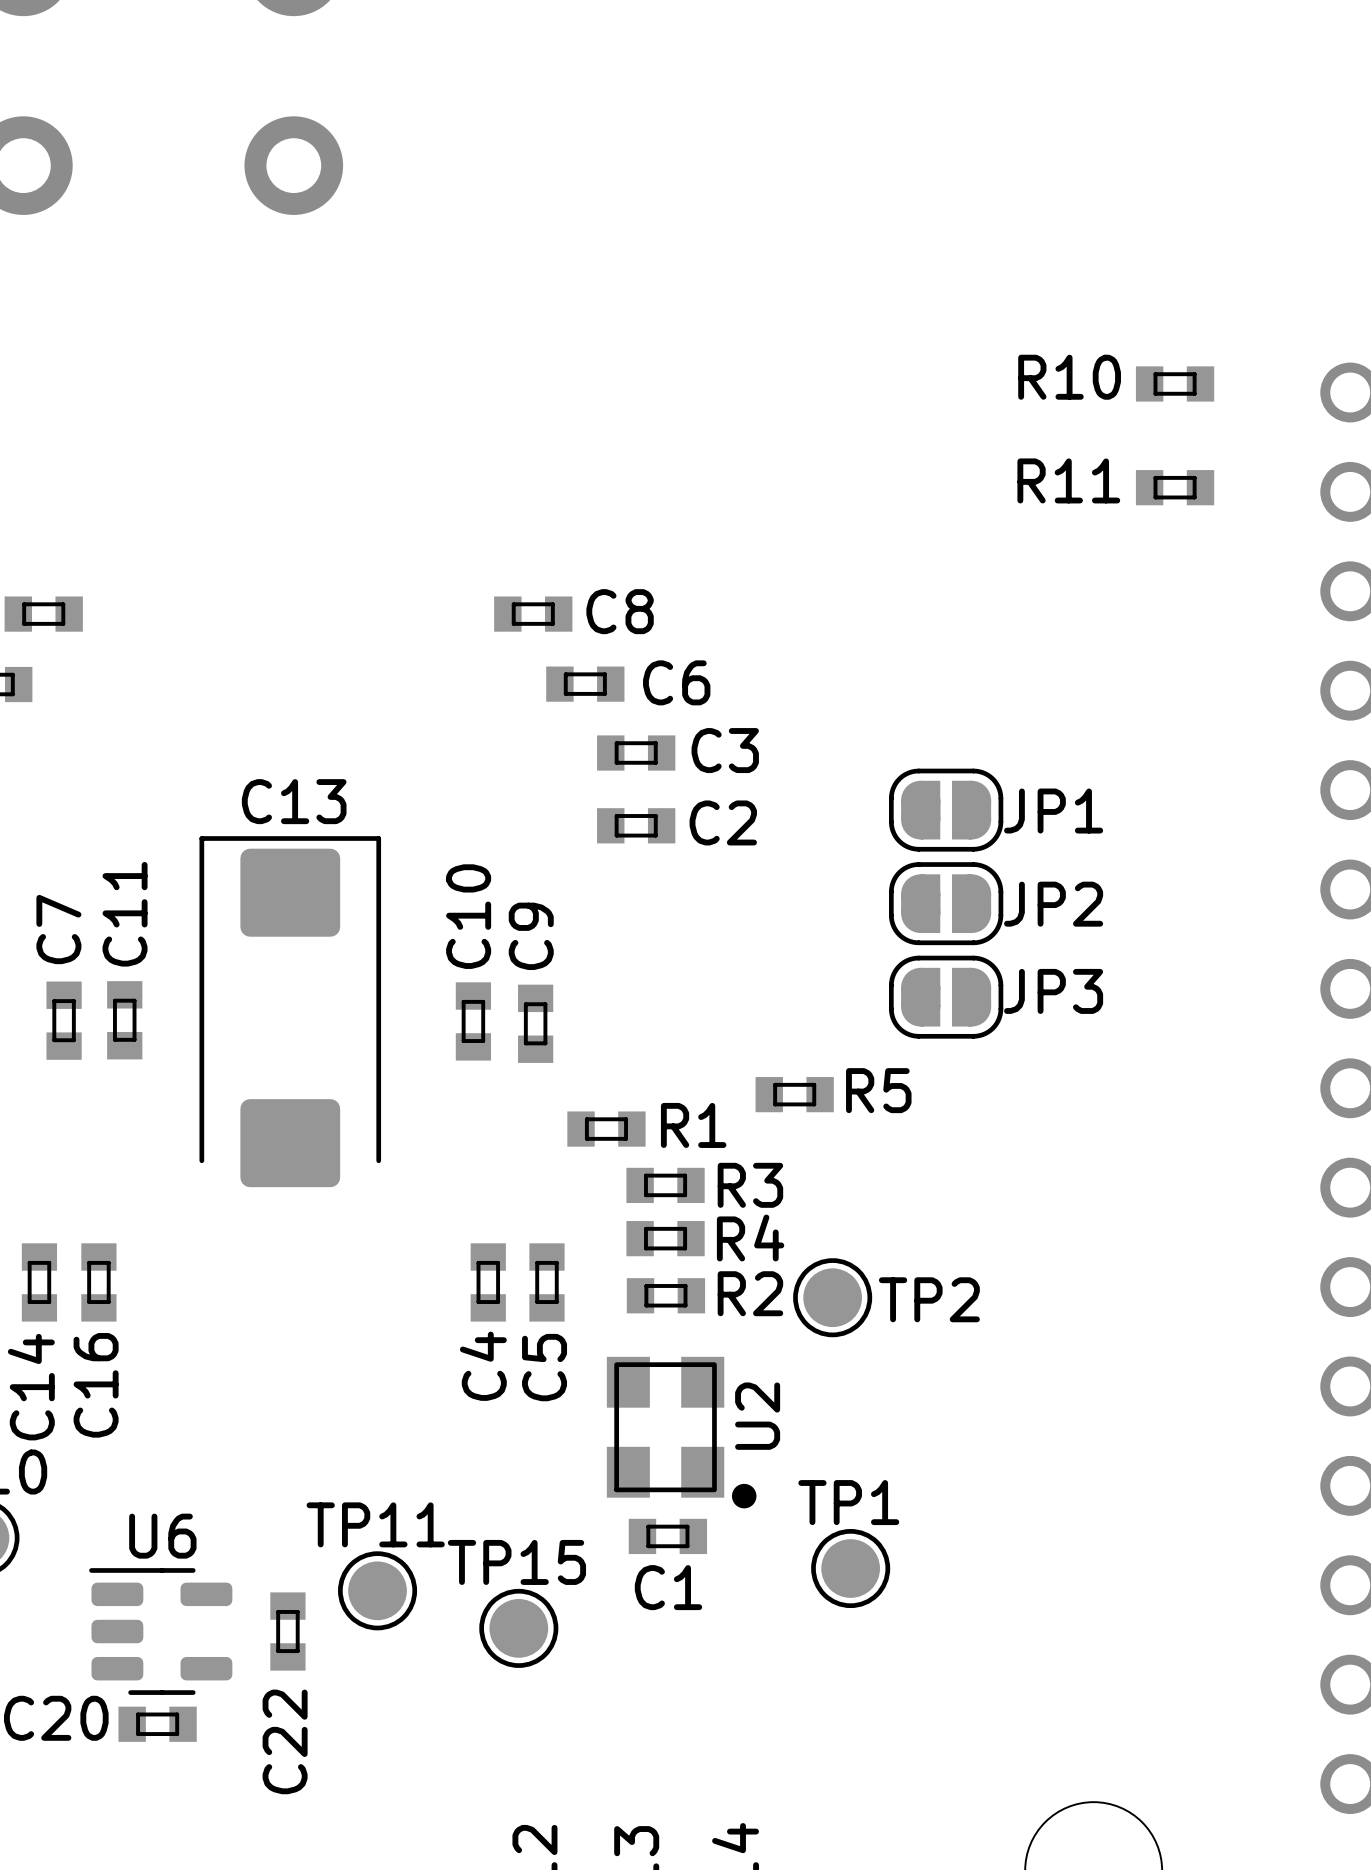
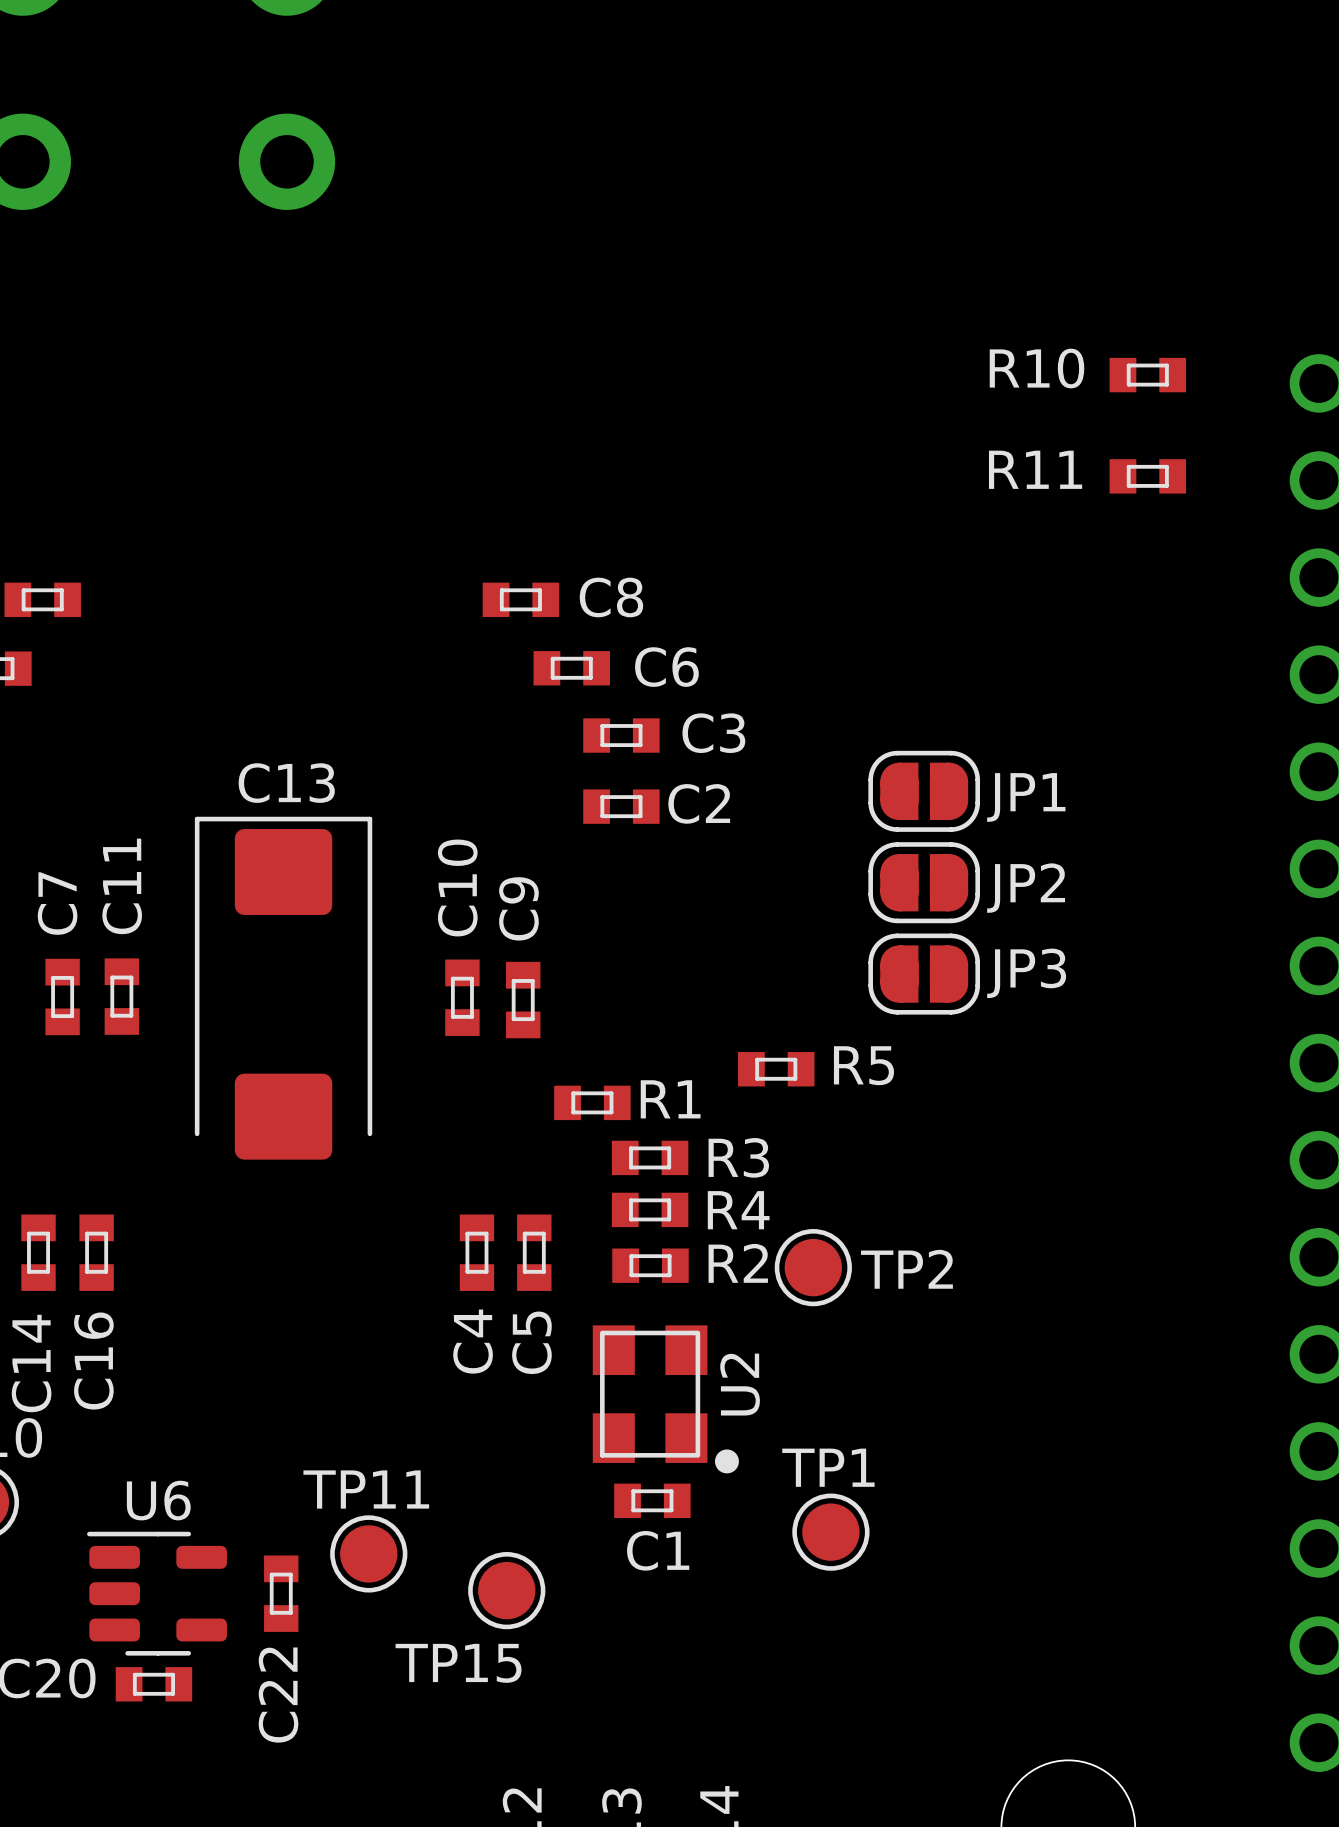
TP15 name position: TP15 (516, 1562) -> TP15 (458, 1663)

